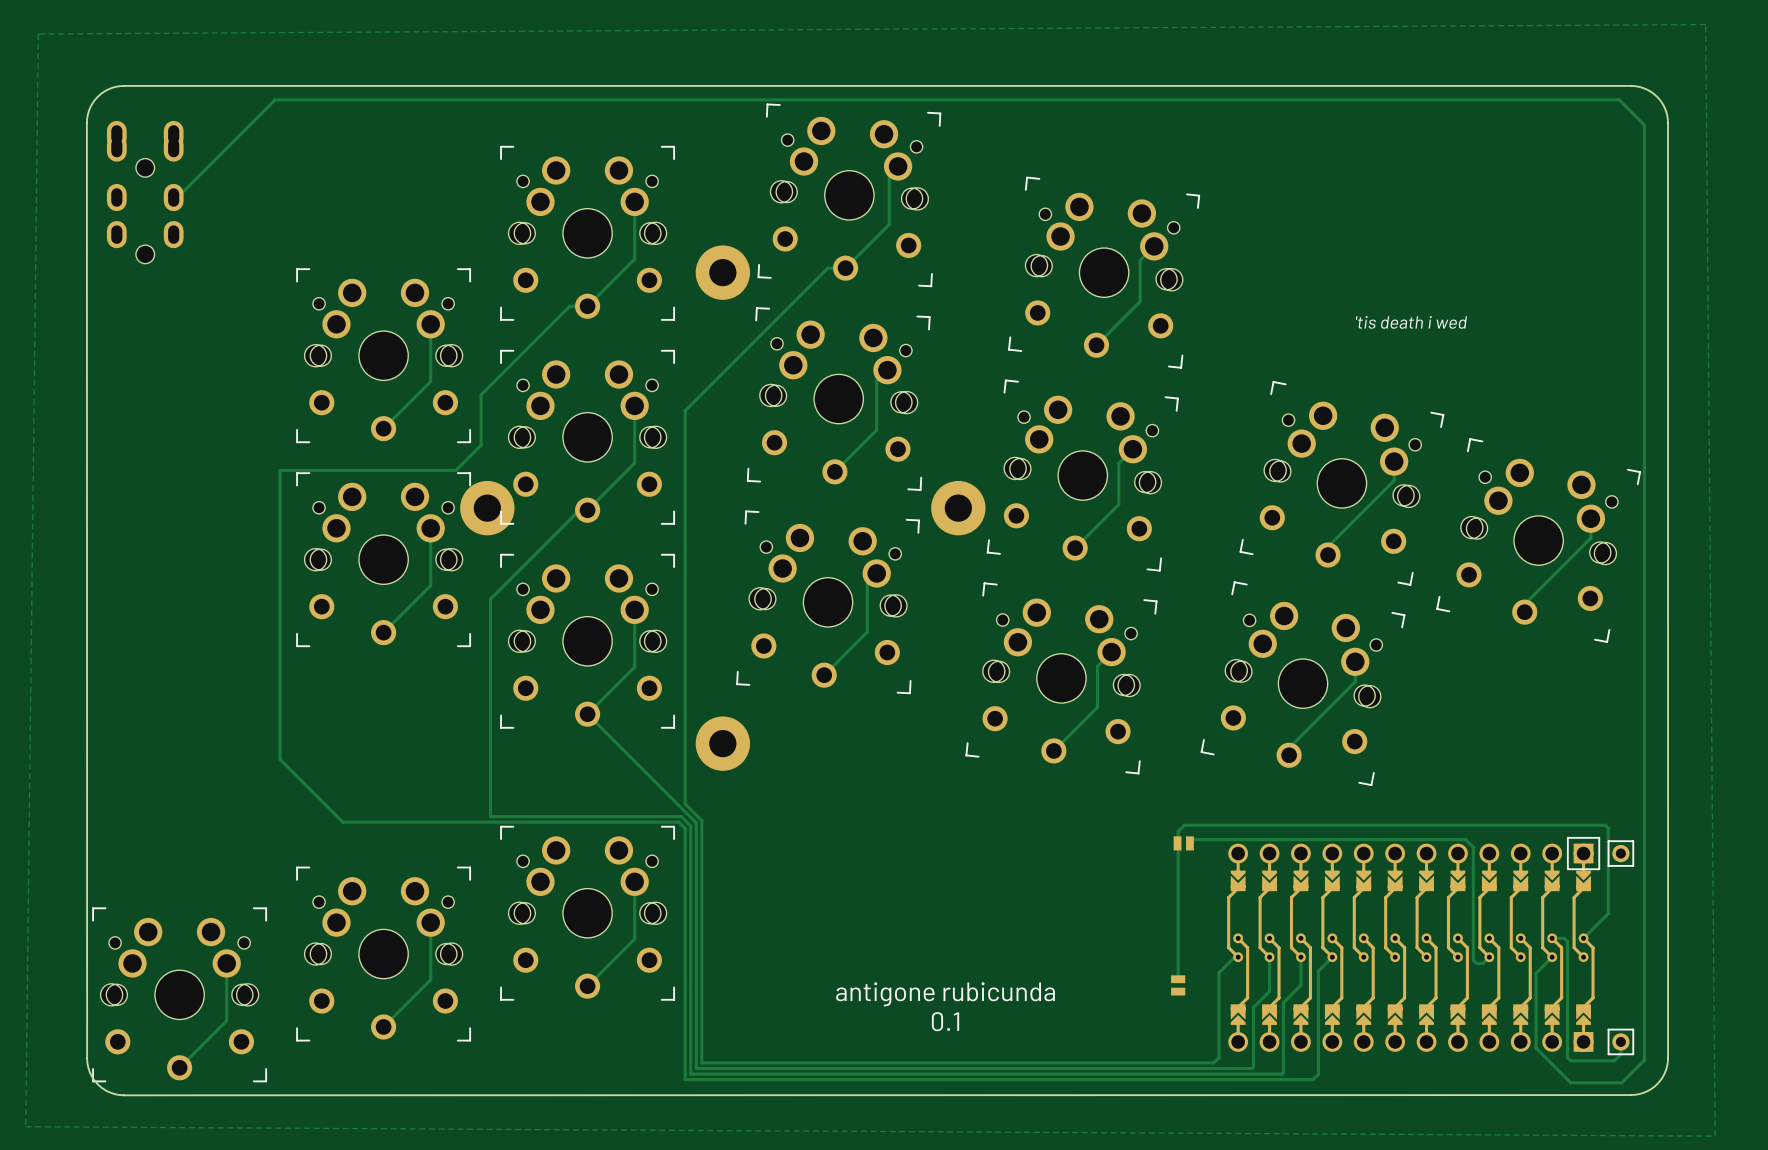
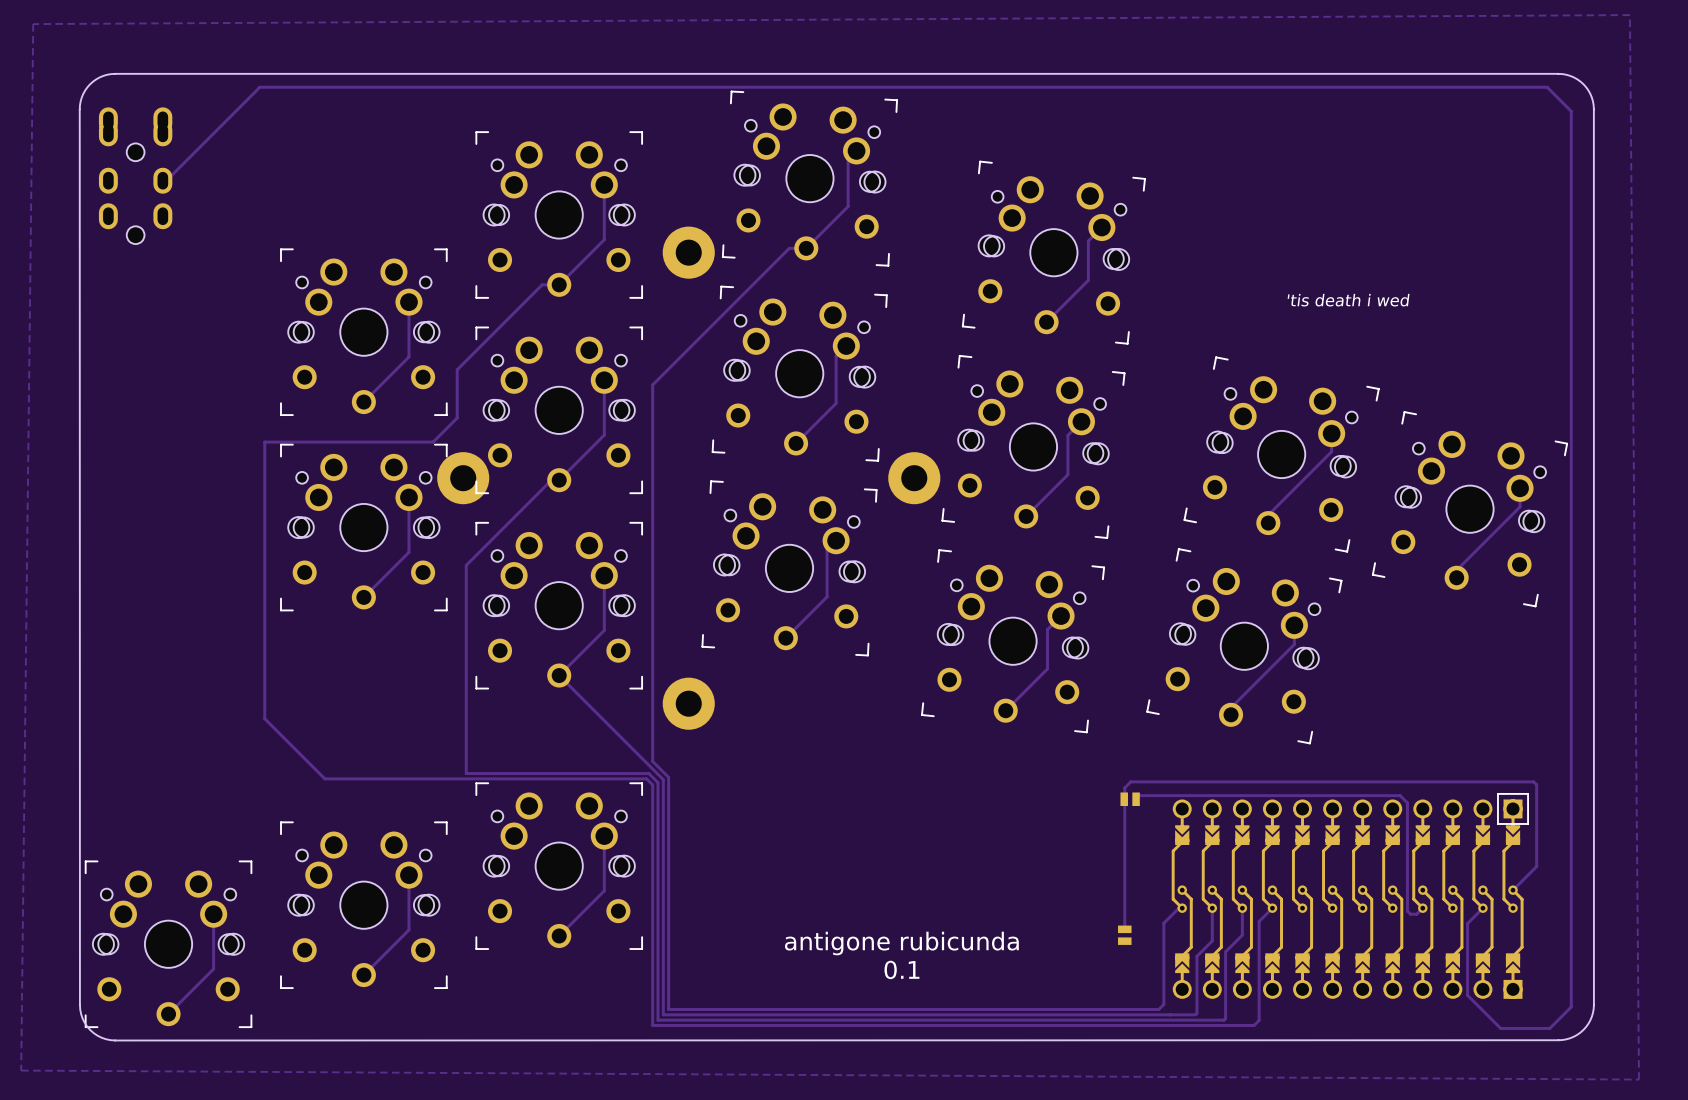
part: (1620, 853) -> none
track: (1552, 938) (1564, 938) (1567, 941) (1567, 1057) (1570, 1060) (1614, 1060) (1620, 1054) (1620, 1041) -> none
part: (1620, 1041) -> none

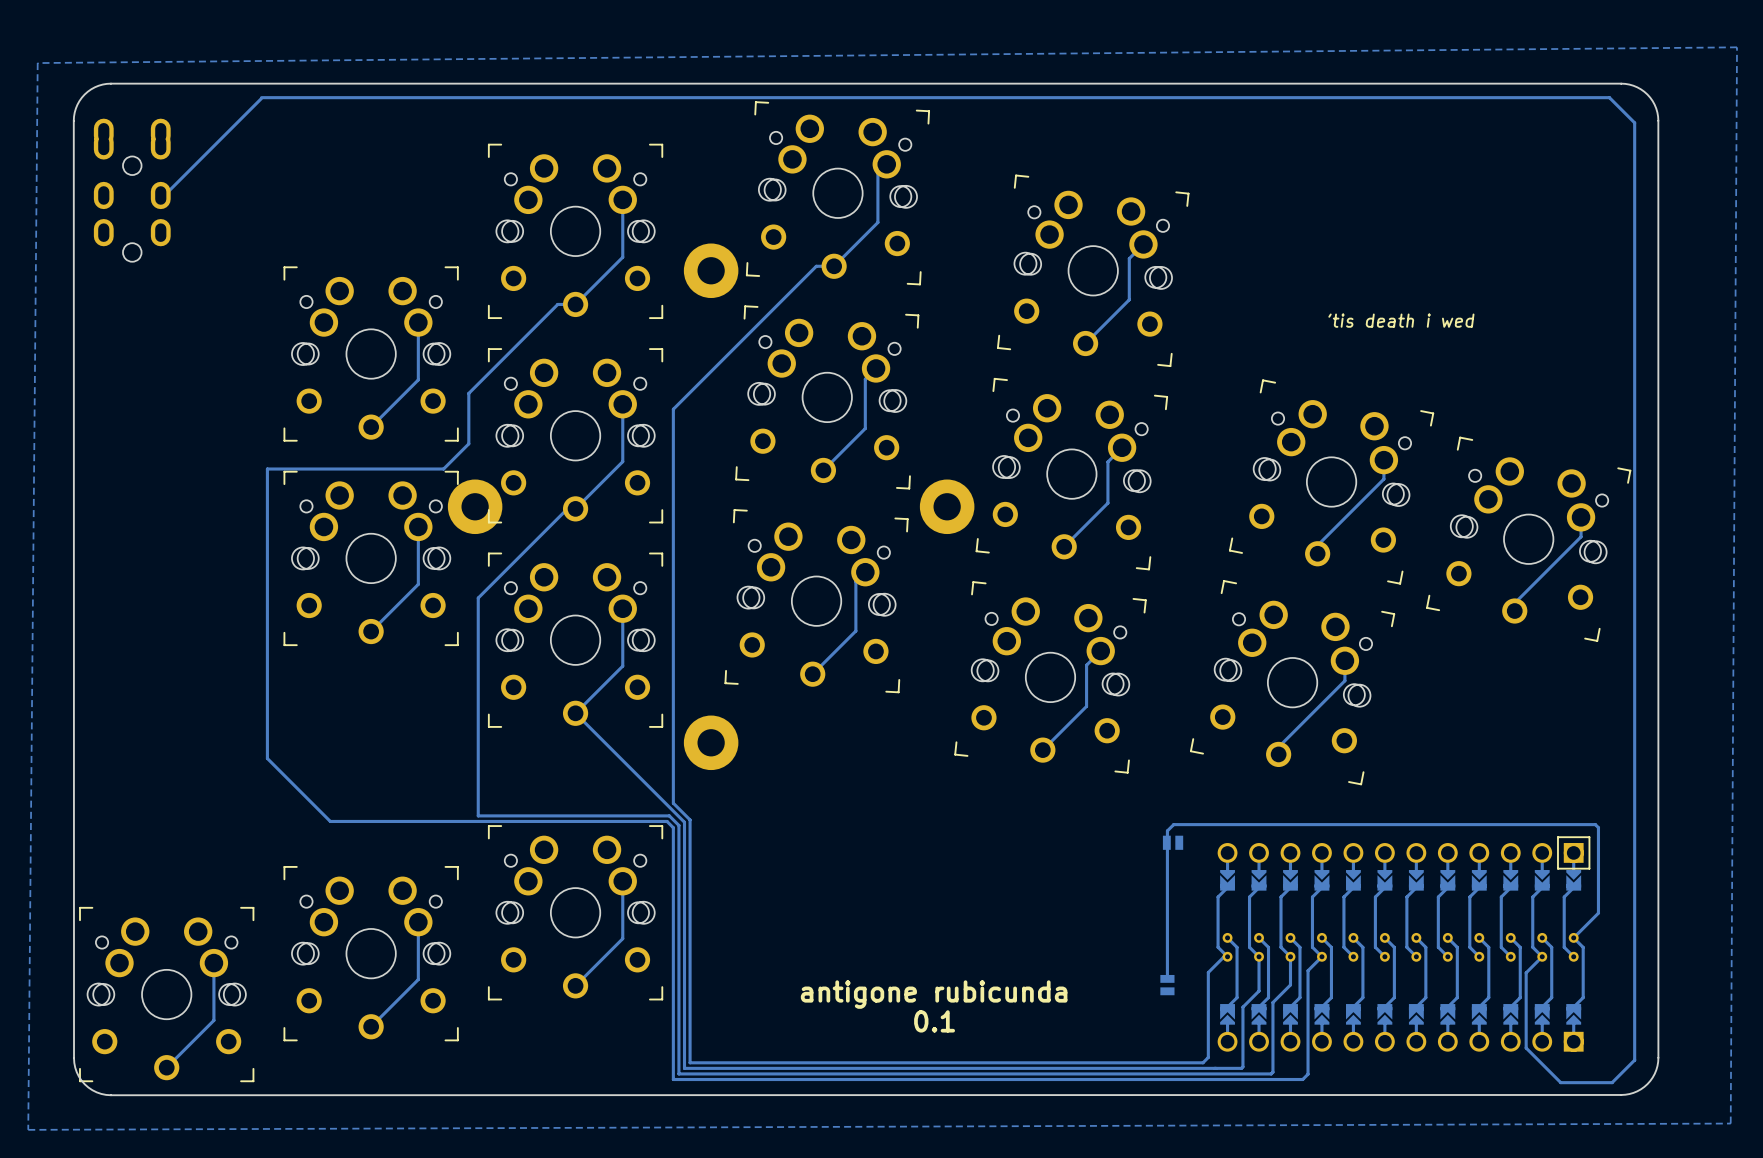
zone outline: (1629, 15) (1638, 1079) (21, 1070) (33, 24) (1629, 15) -> (1737, 47) (1730, 1123) (28, 1129) (37, 63) (1737, 47)
track: (1136, 799) (1139, 795) (1400, 795) (1407, 802) (1407, 911) (1410, 914) (1416, 914) (1422, 908) -> none

